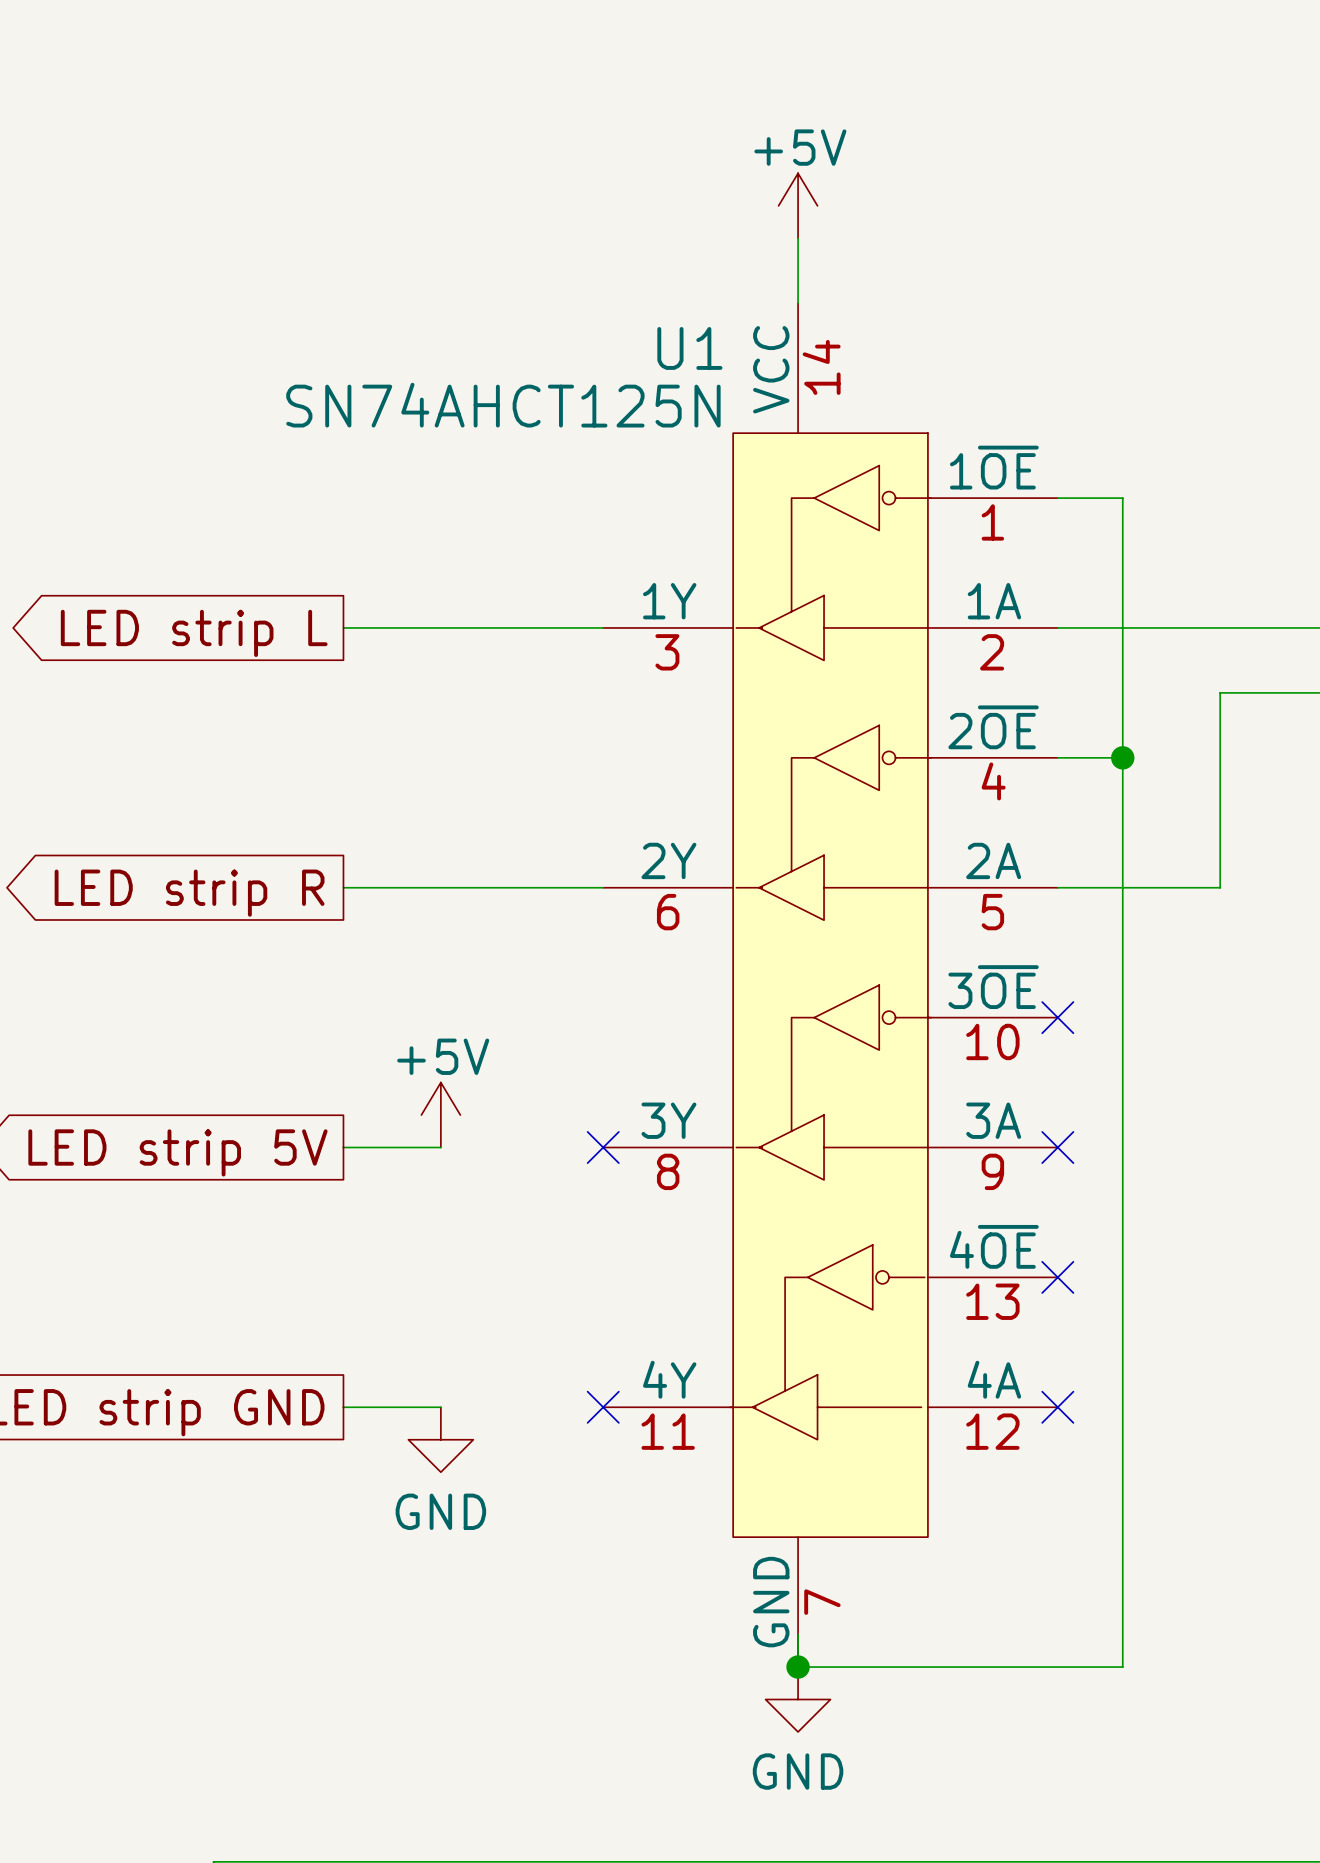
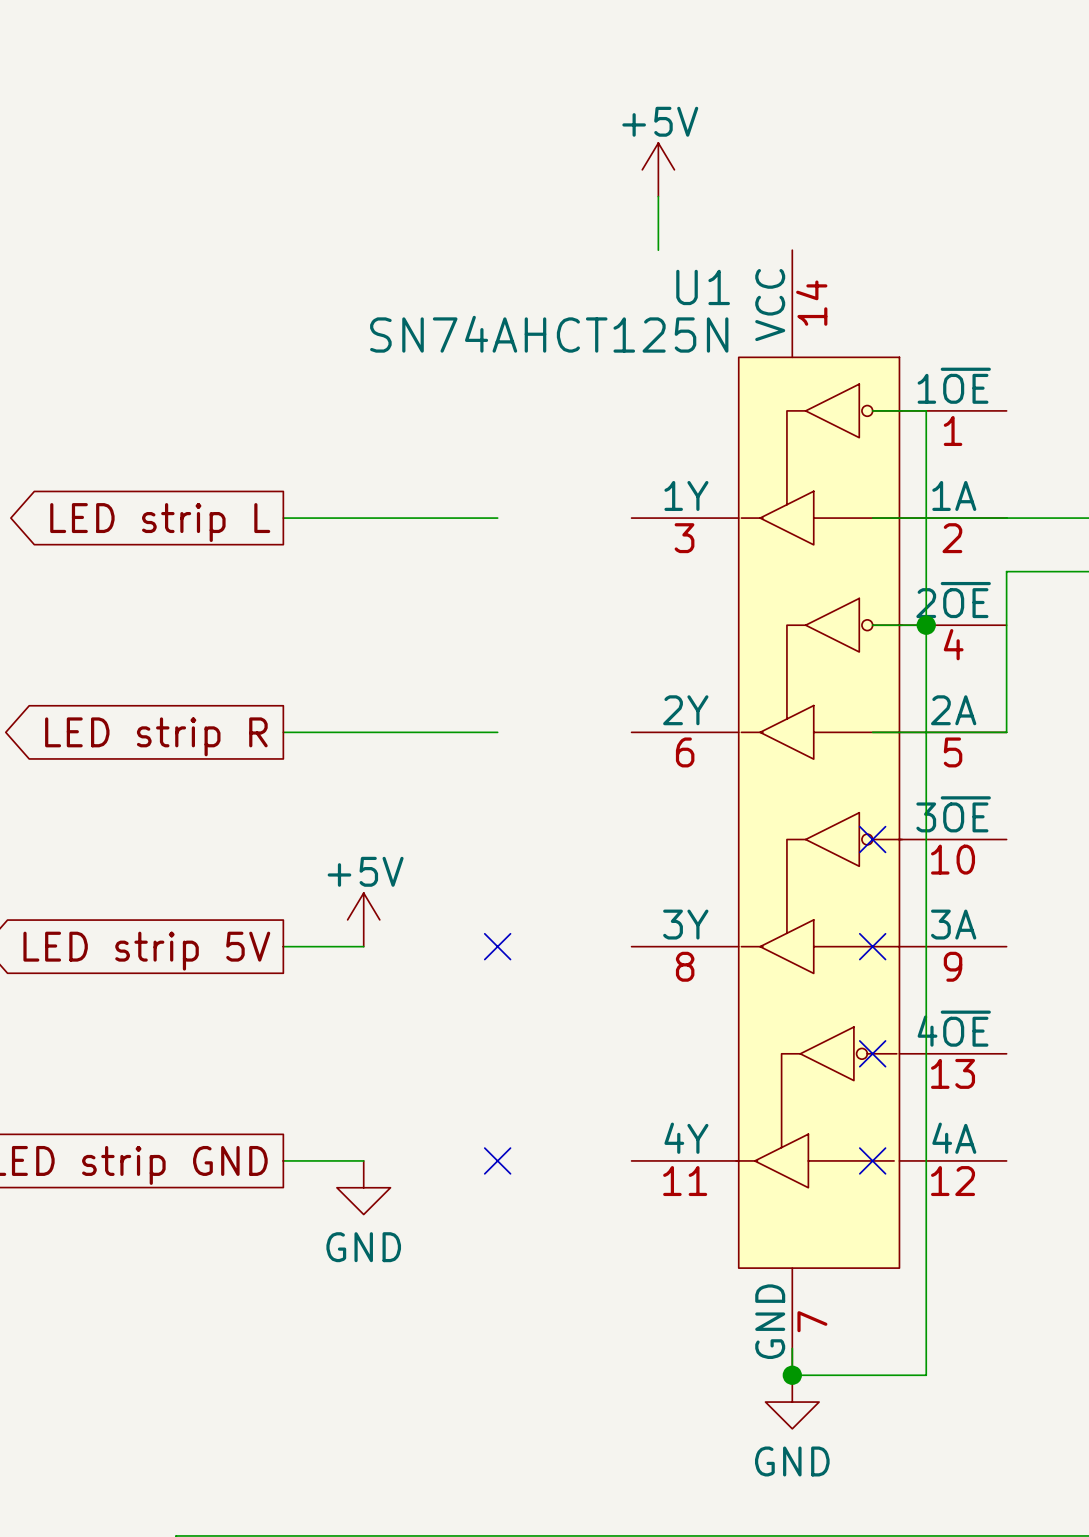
U1 position: (830, 985) -> (819, 812)
wire: (798, 1634) (798, 1667) (960, 1667) -> (792, 1348) (792, 1375)
junction: (798, 1667) -> none
junction: none -> (792, 1375)
power symbol position: GND (798, 1699) -> GND (792, 1402)

